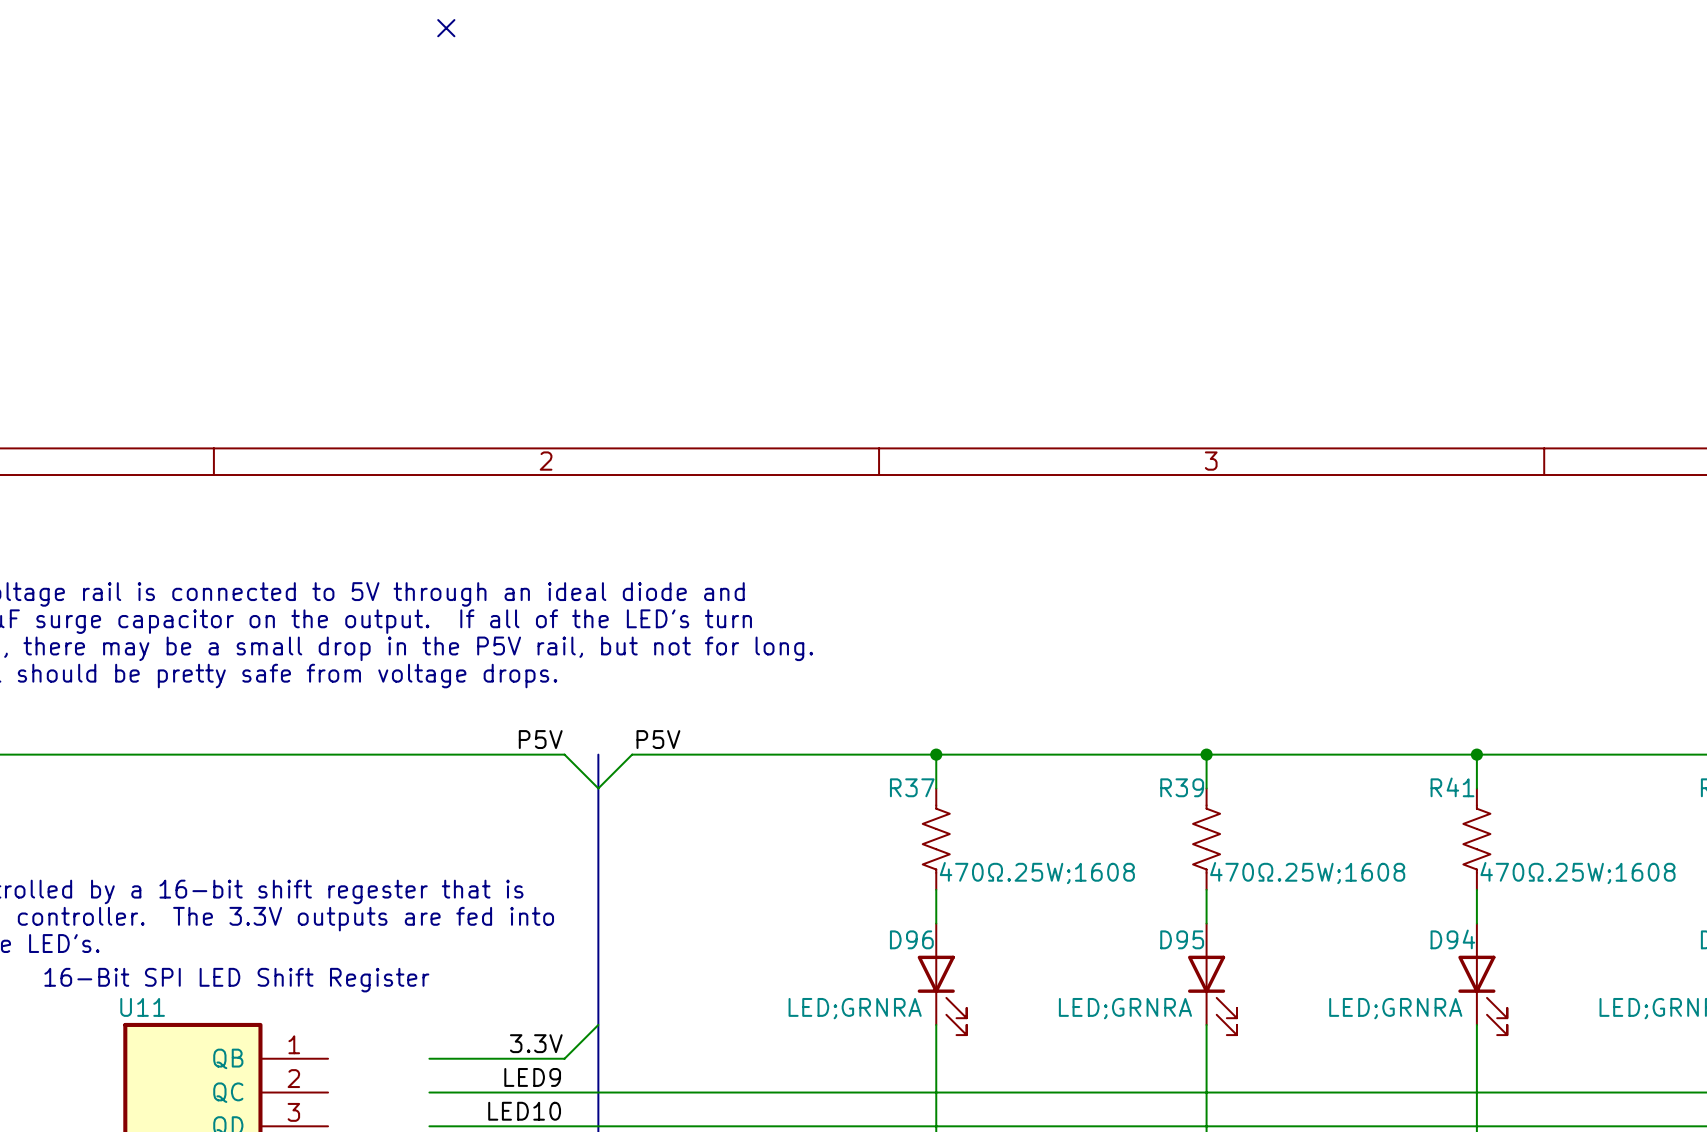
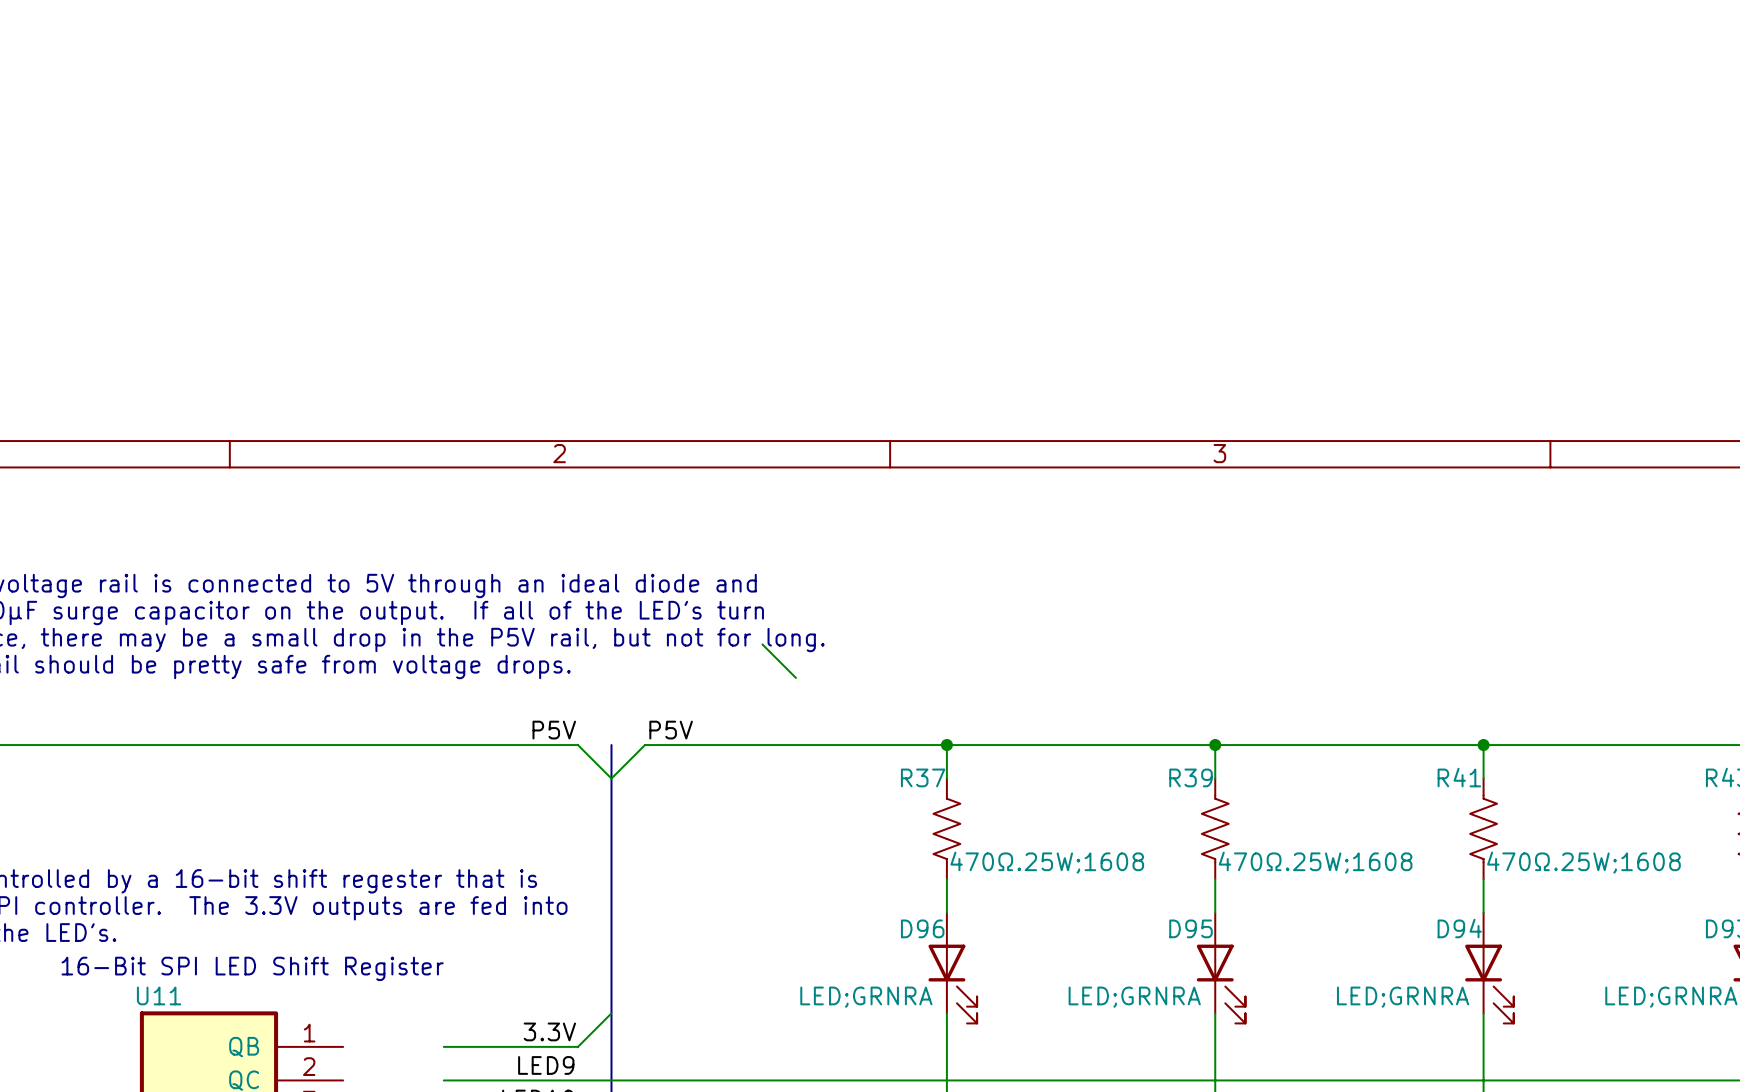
no-connect mark: (446, 28) -> none
wire: none -> (762, 644) (795, 677)

